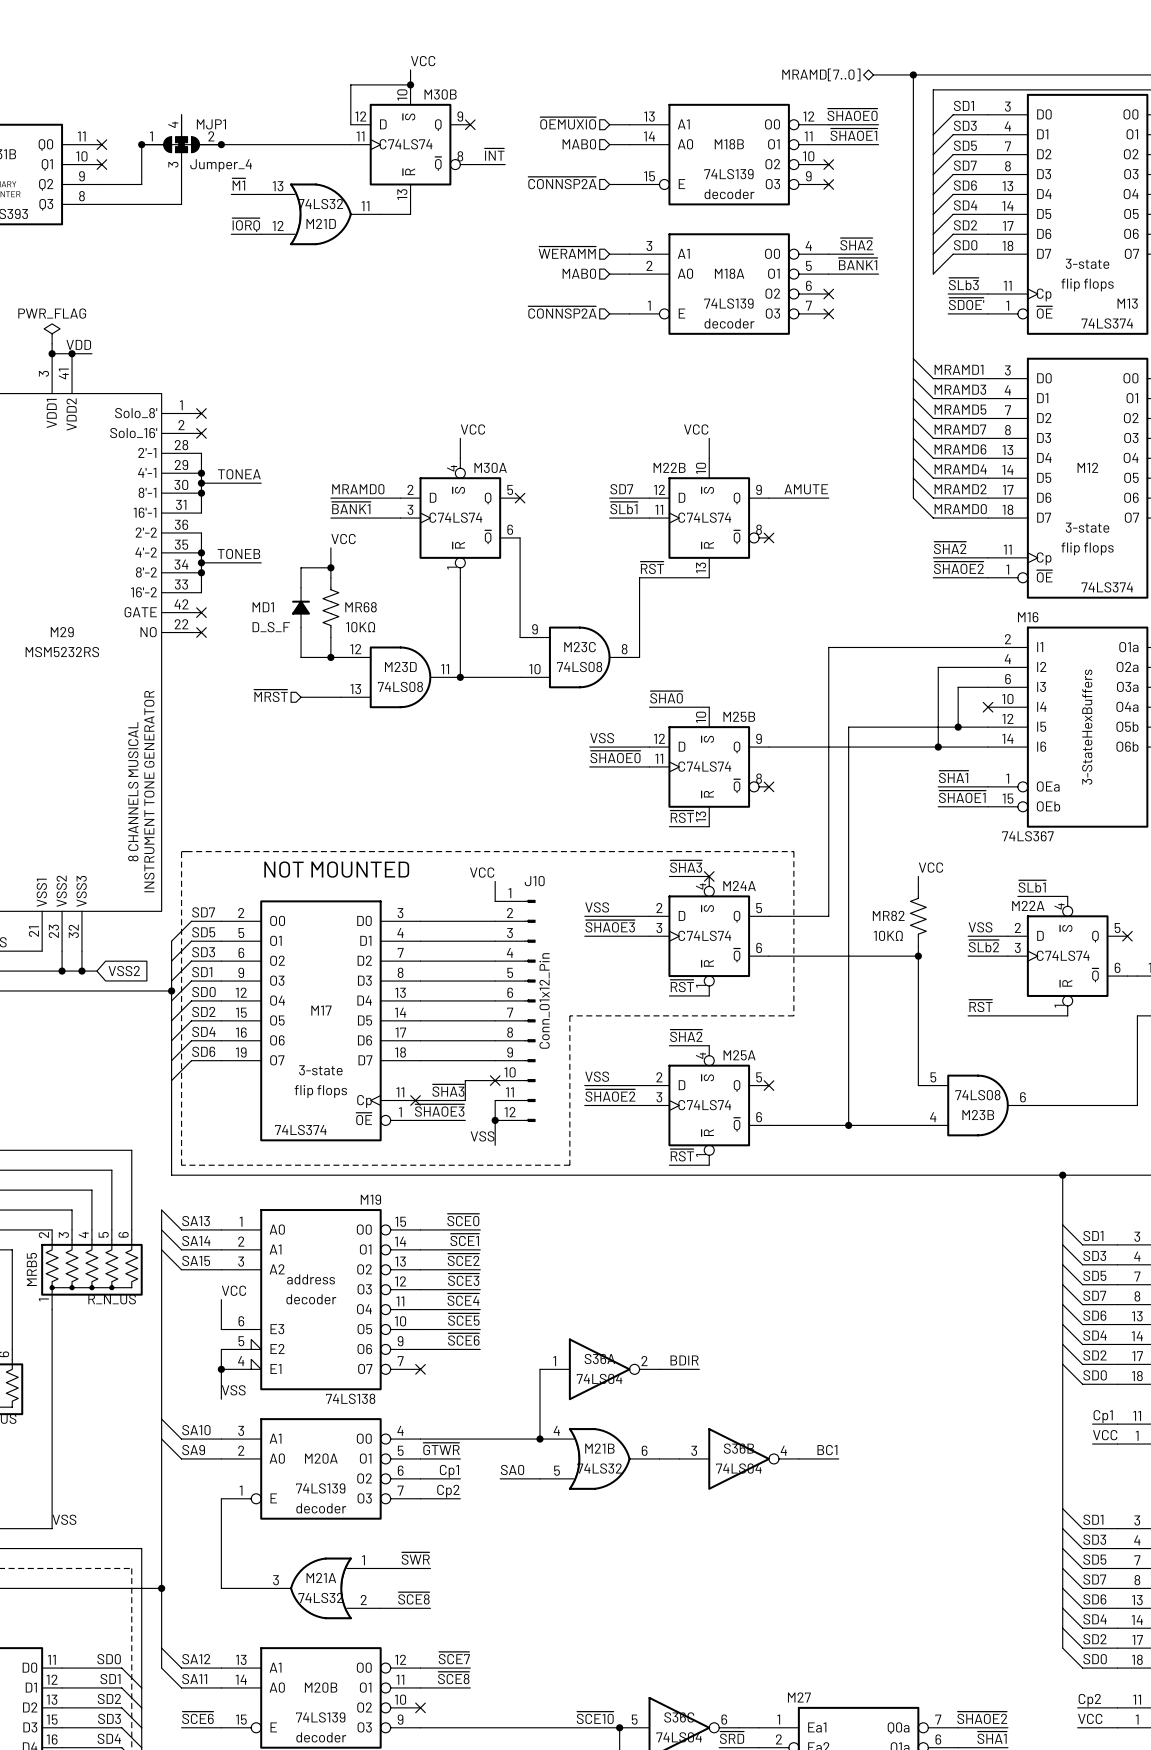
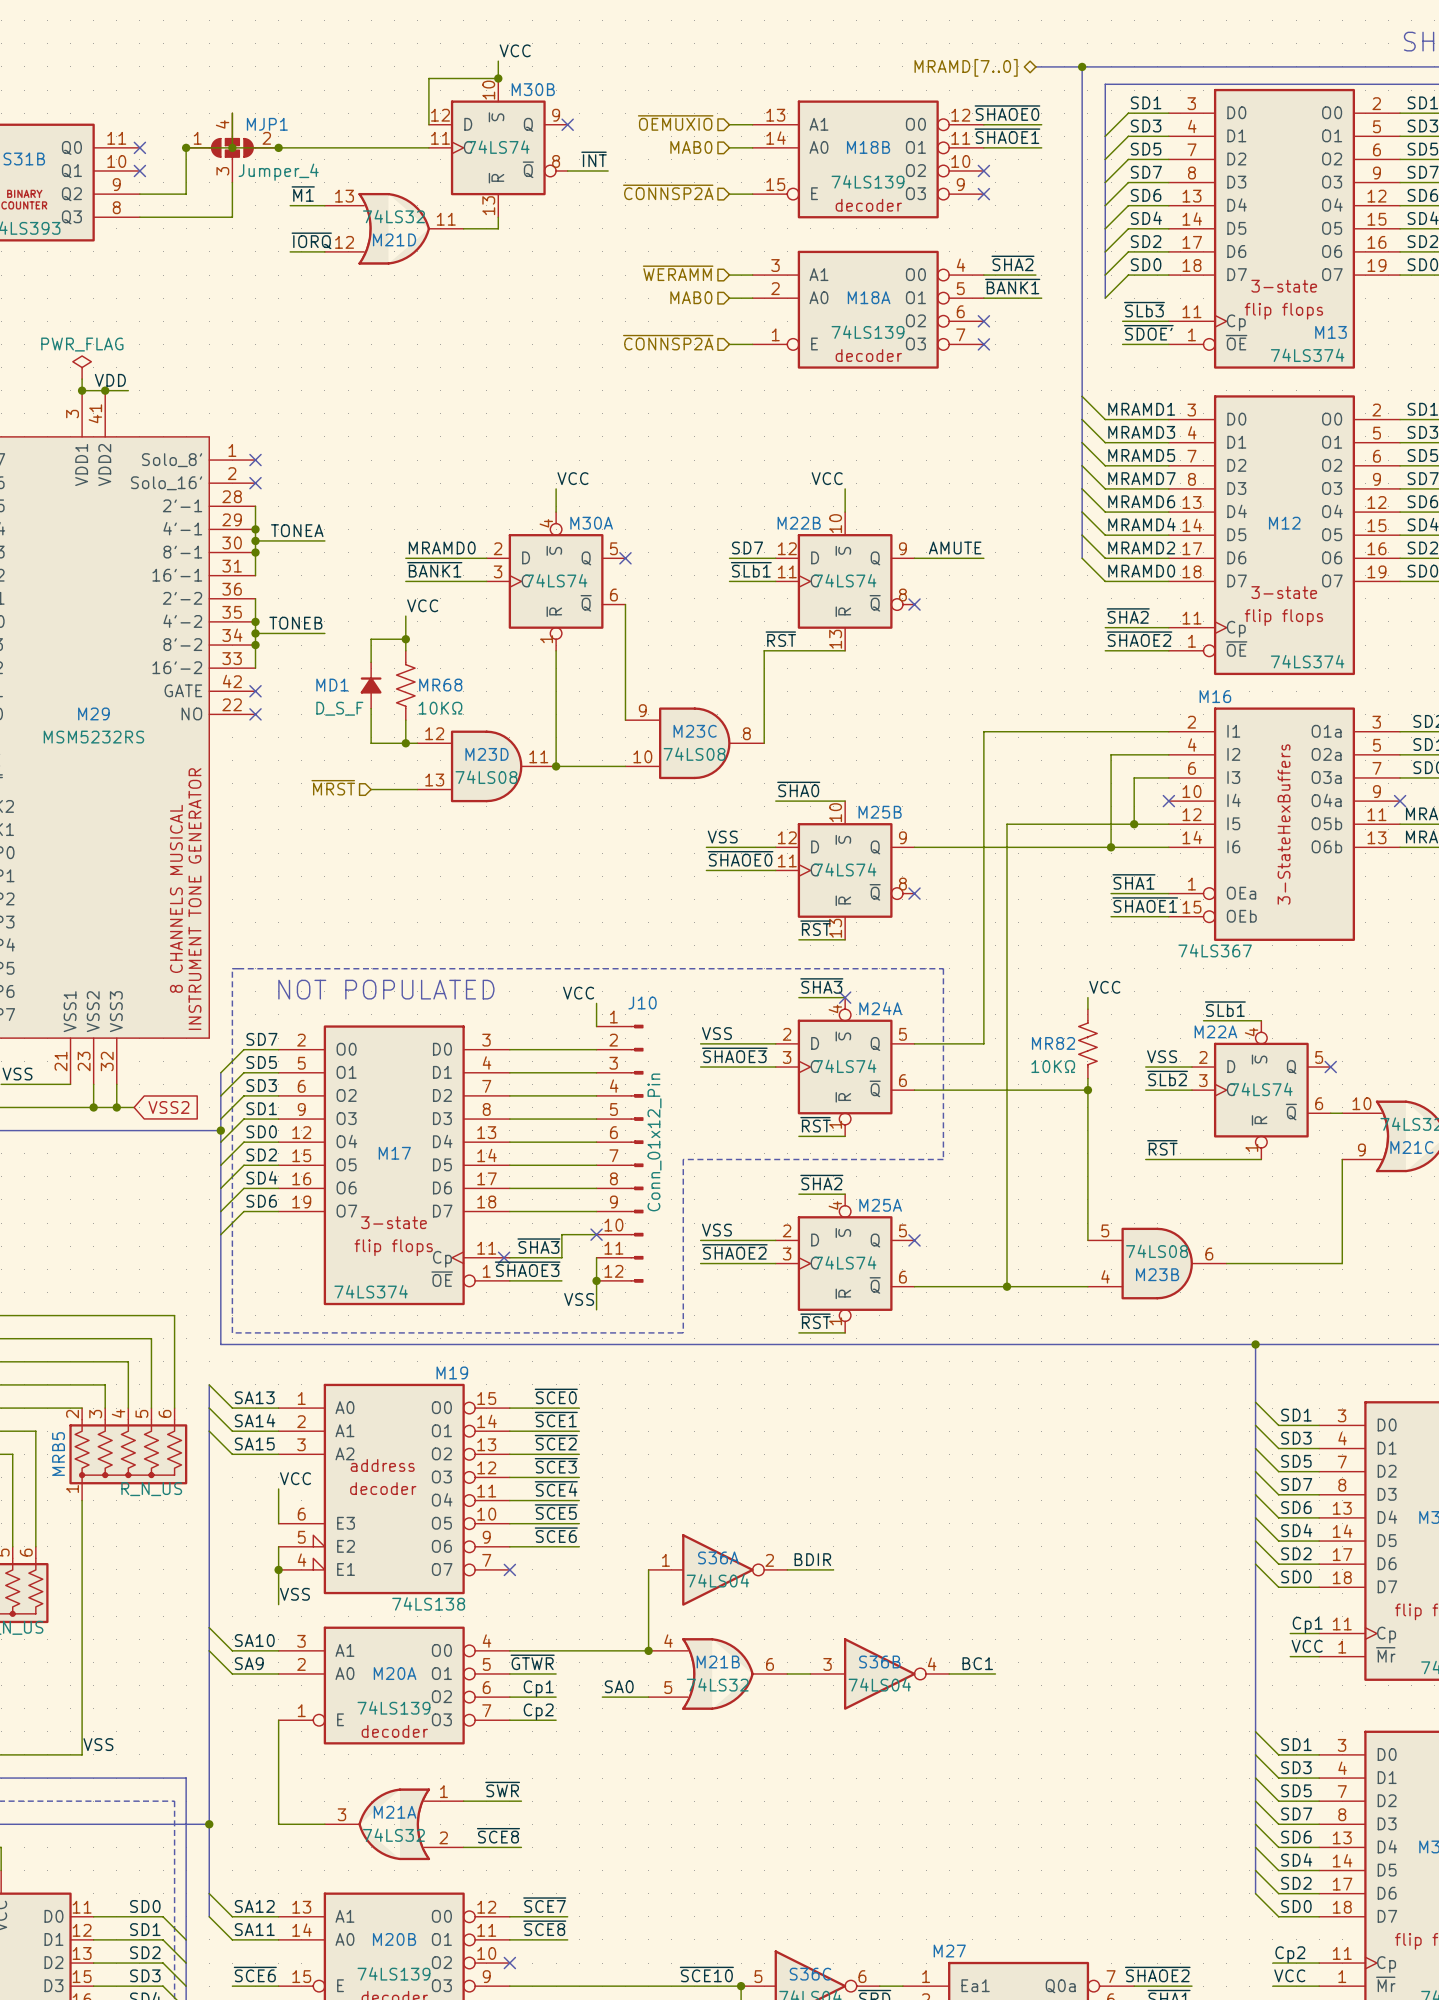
text: NOT MOUNTED (336, 869) -> NOT POPULATED (386, 989)

